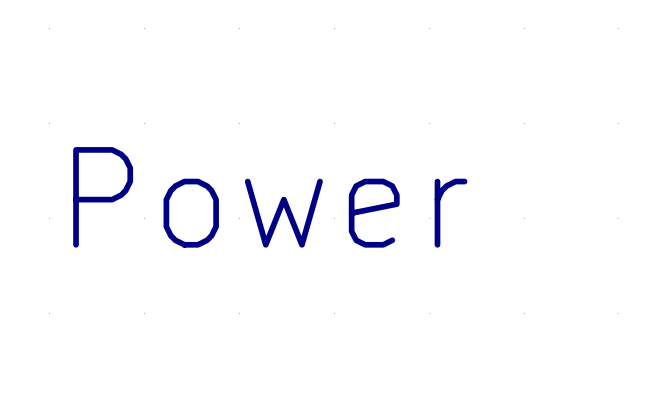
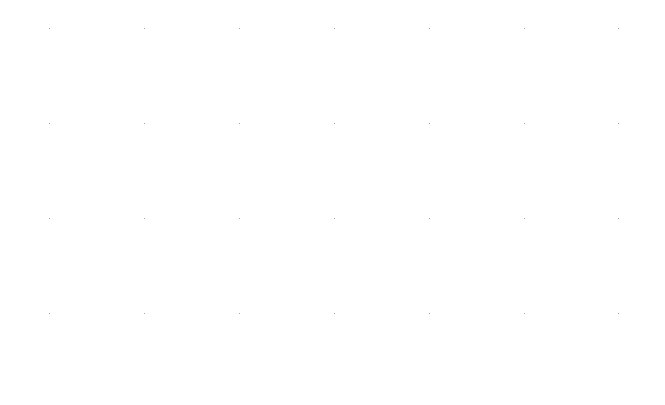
text: Power (270, 197) -> none

